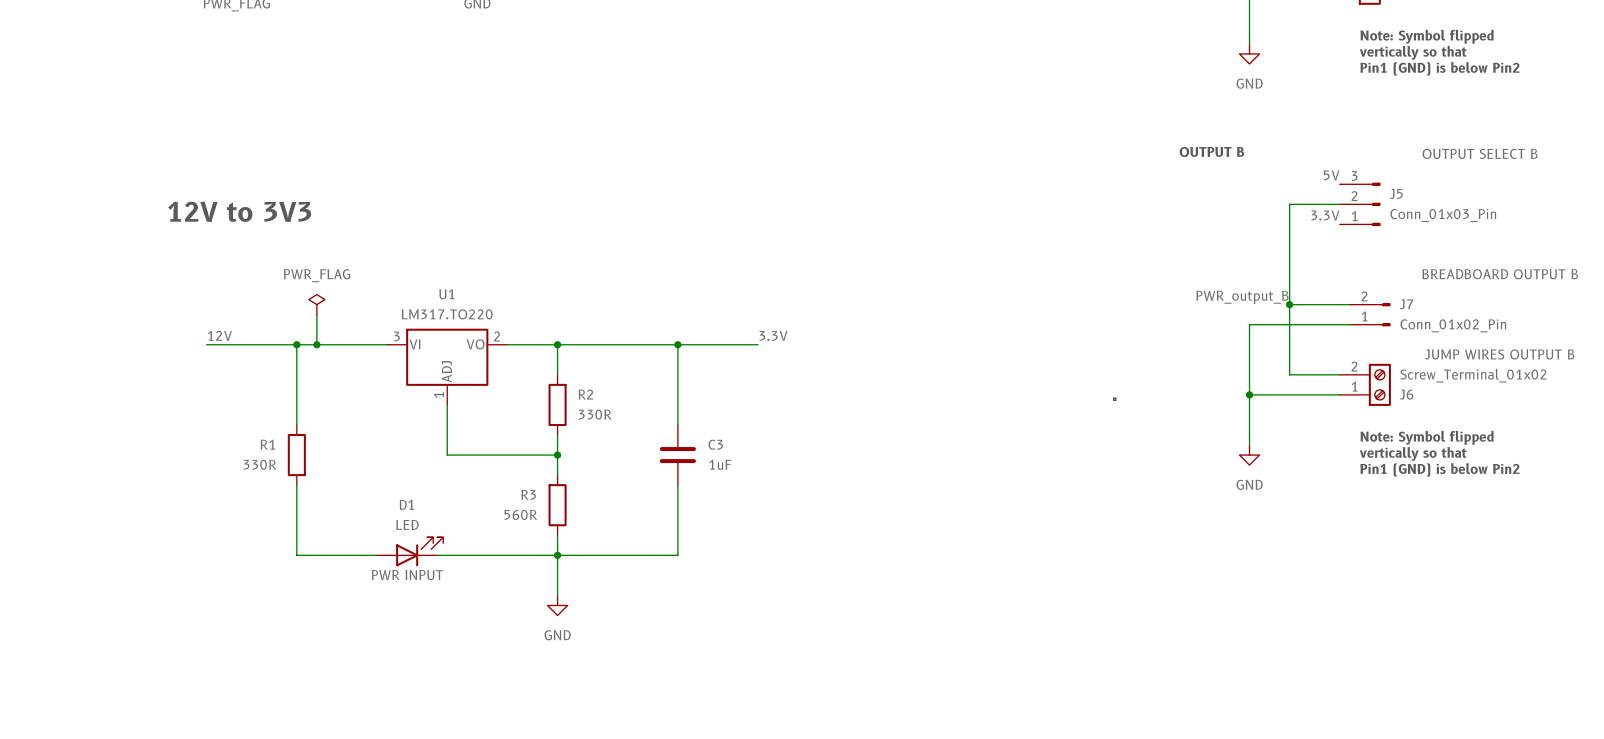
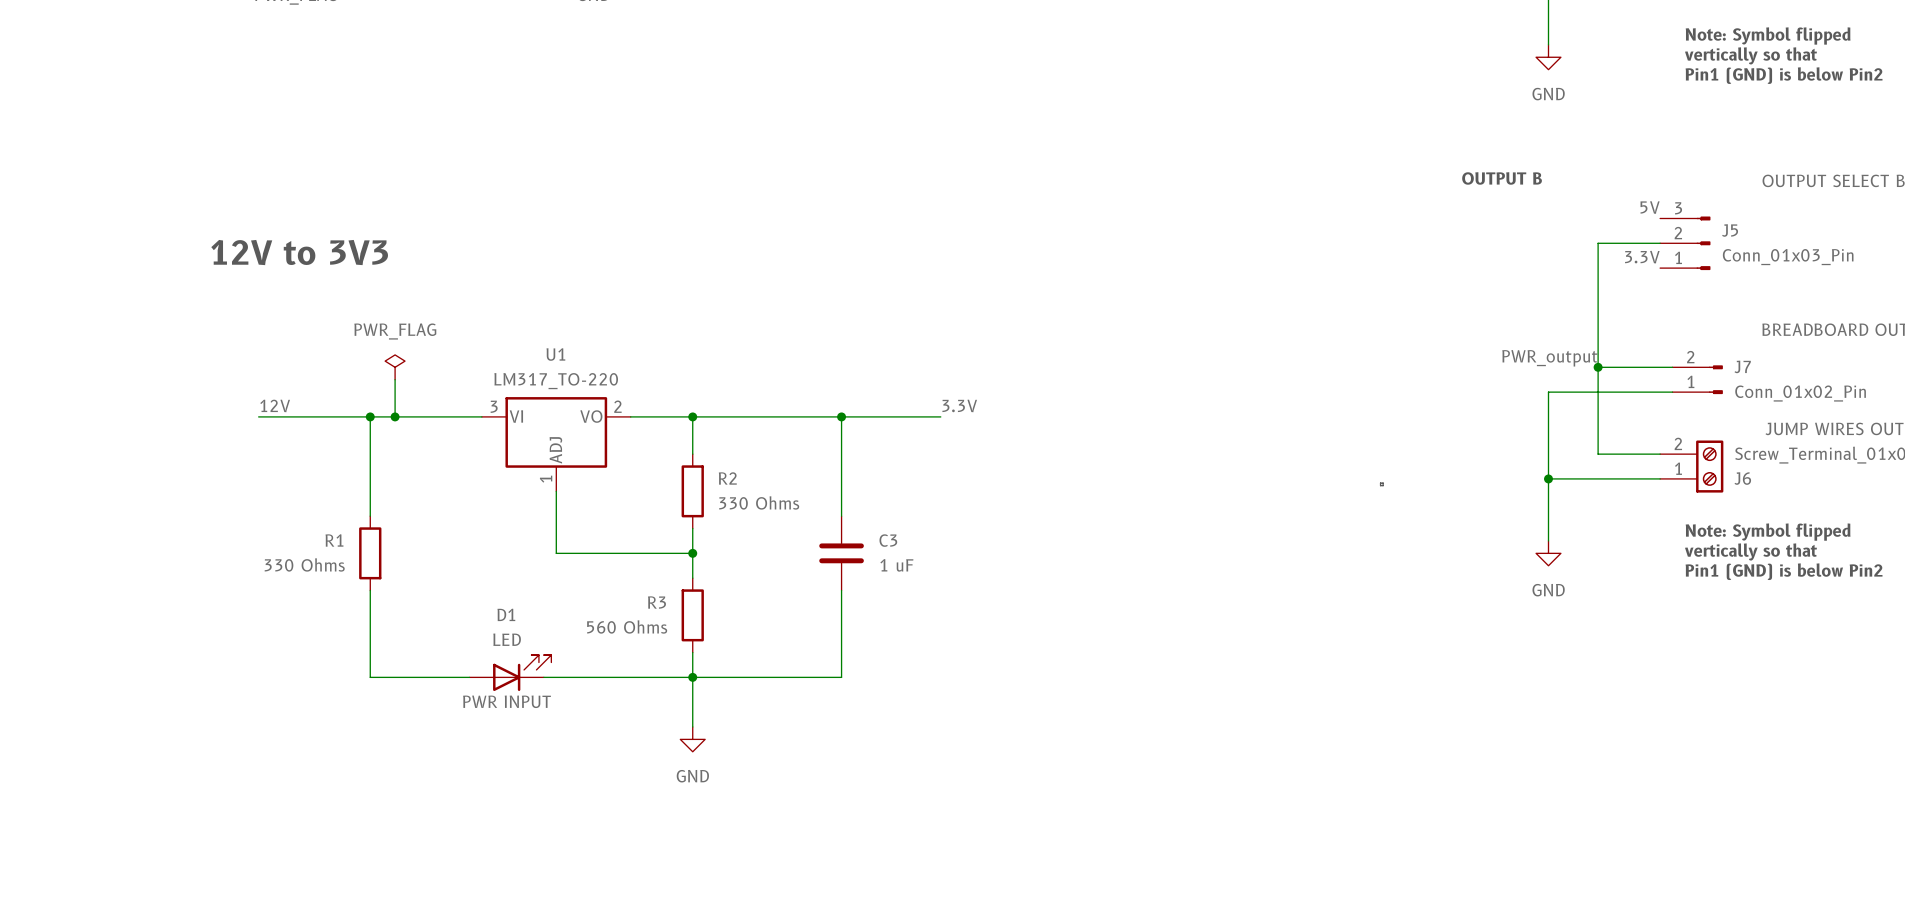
label: PWR_output_B (1242, 297) -> PWR_output (1549, 358)
U1 value: LM317.TO220 (447, 314) -> LM317_TO-220 (556, 381)
R2 value: 330R (595, 414) -> 330 Ohms (759, 502)
R1 value: 330R (260, 464) -> 330 Ohms (304, 564)
C3 value: 1uF (720, 464) -> 1 uF (896, 565)
R3 value: 560R (520, 514) -> 560 Ohms (627, 626)

